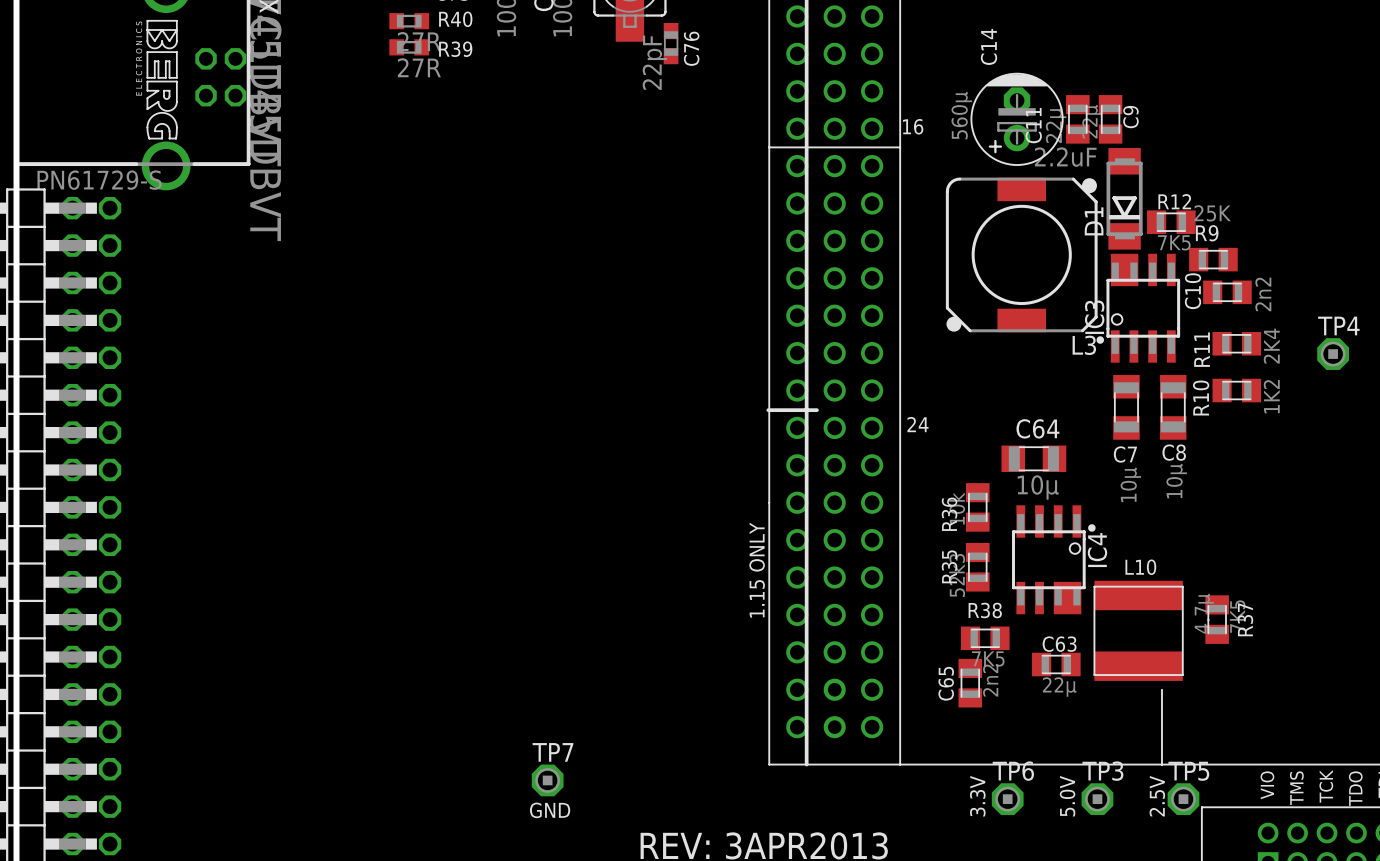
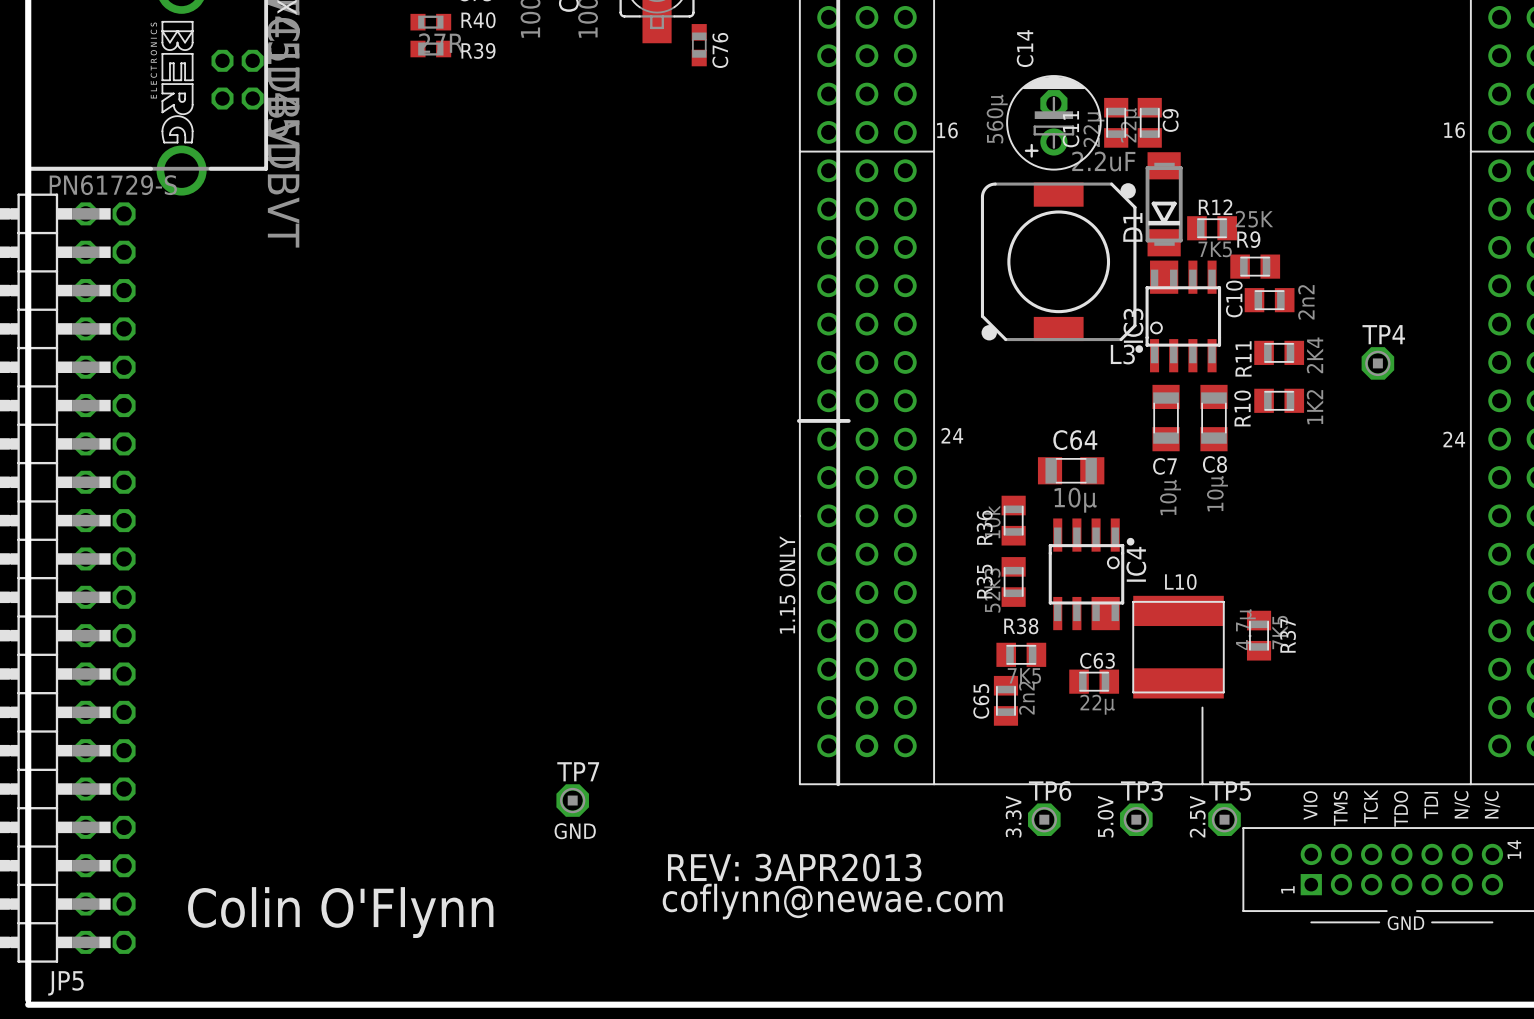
C76 value: 22pF (654, 62) -> none
R39 value: 27R (419, 67) -> none

